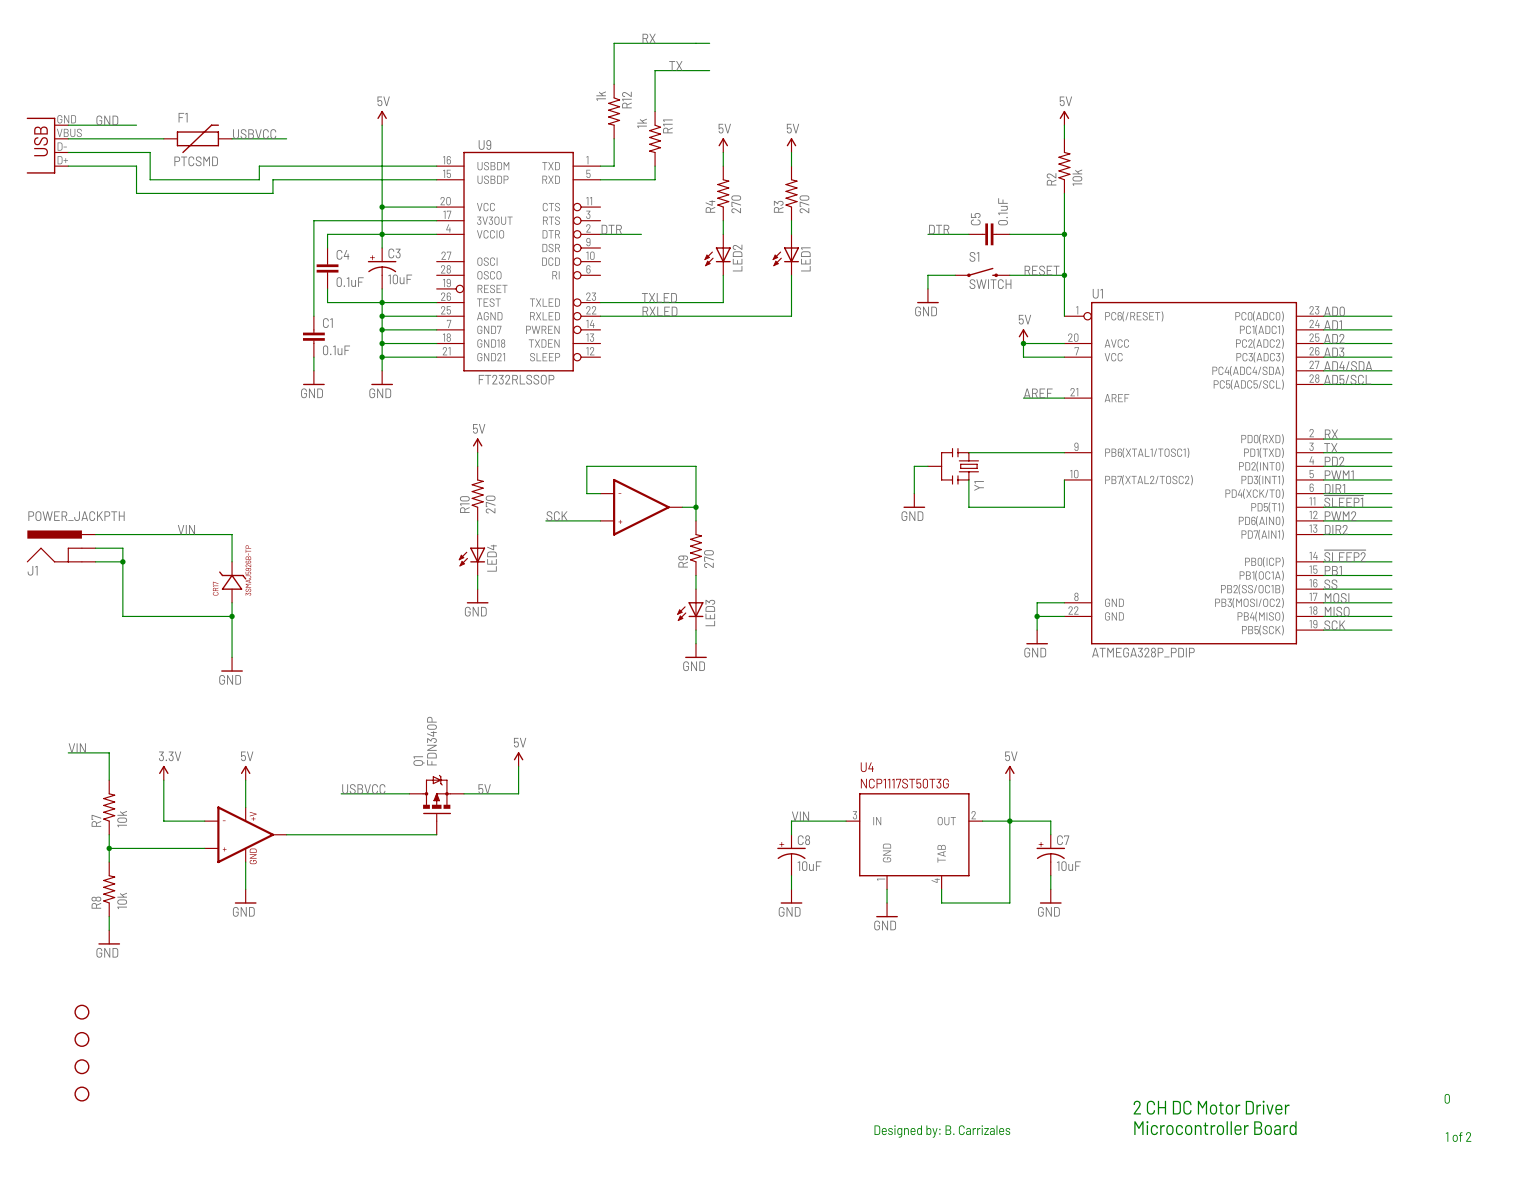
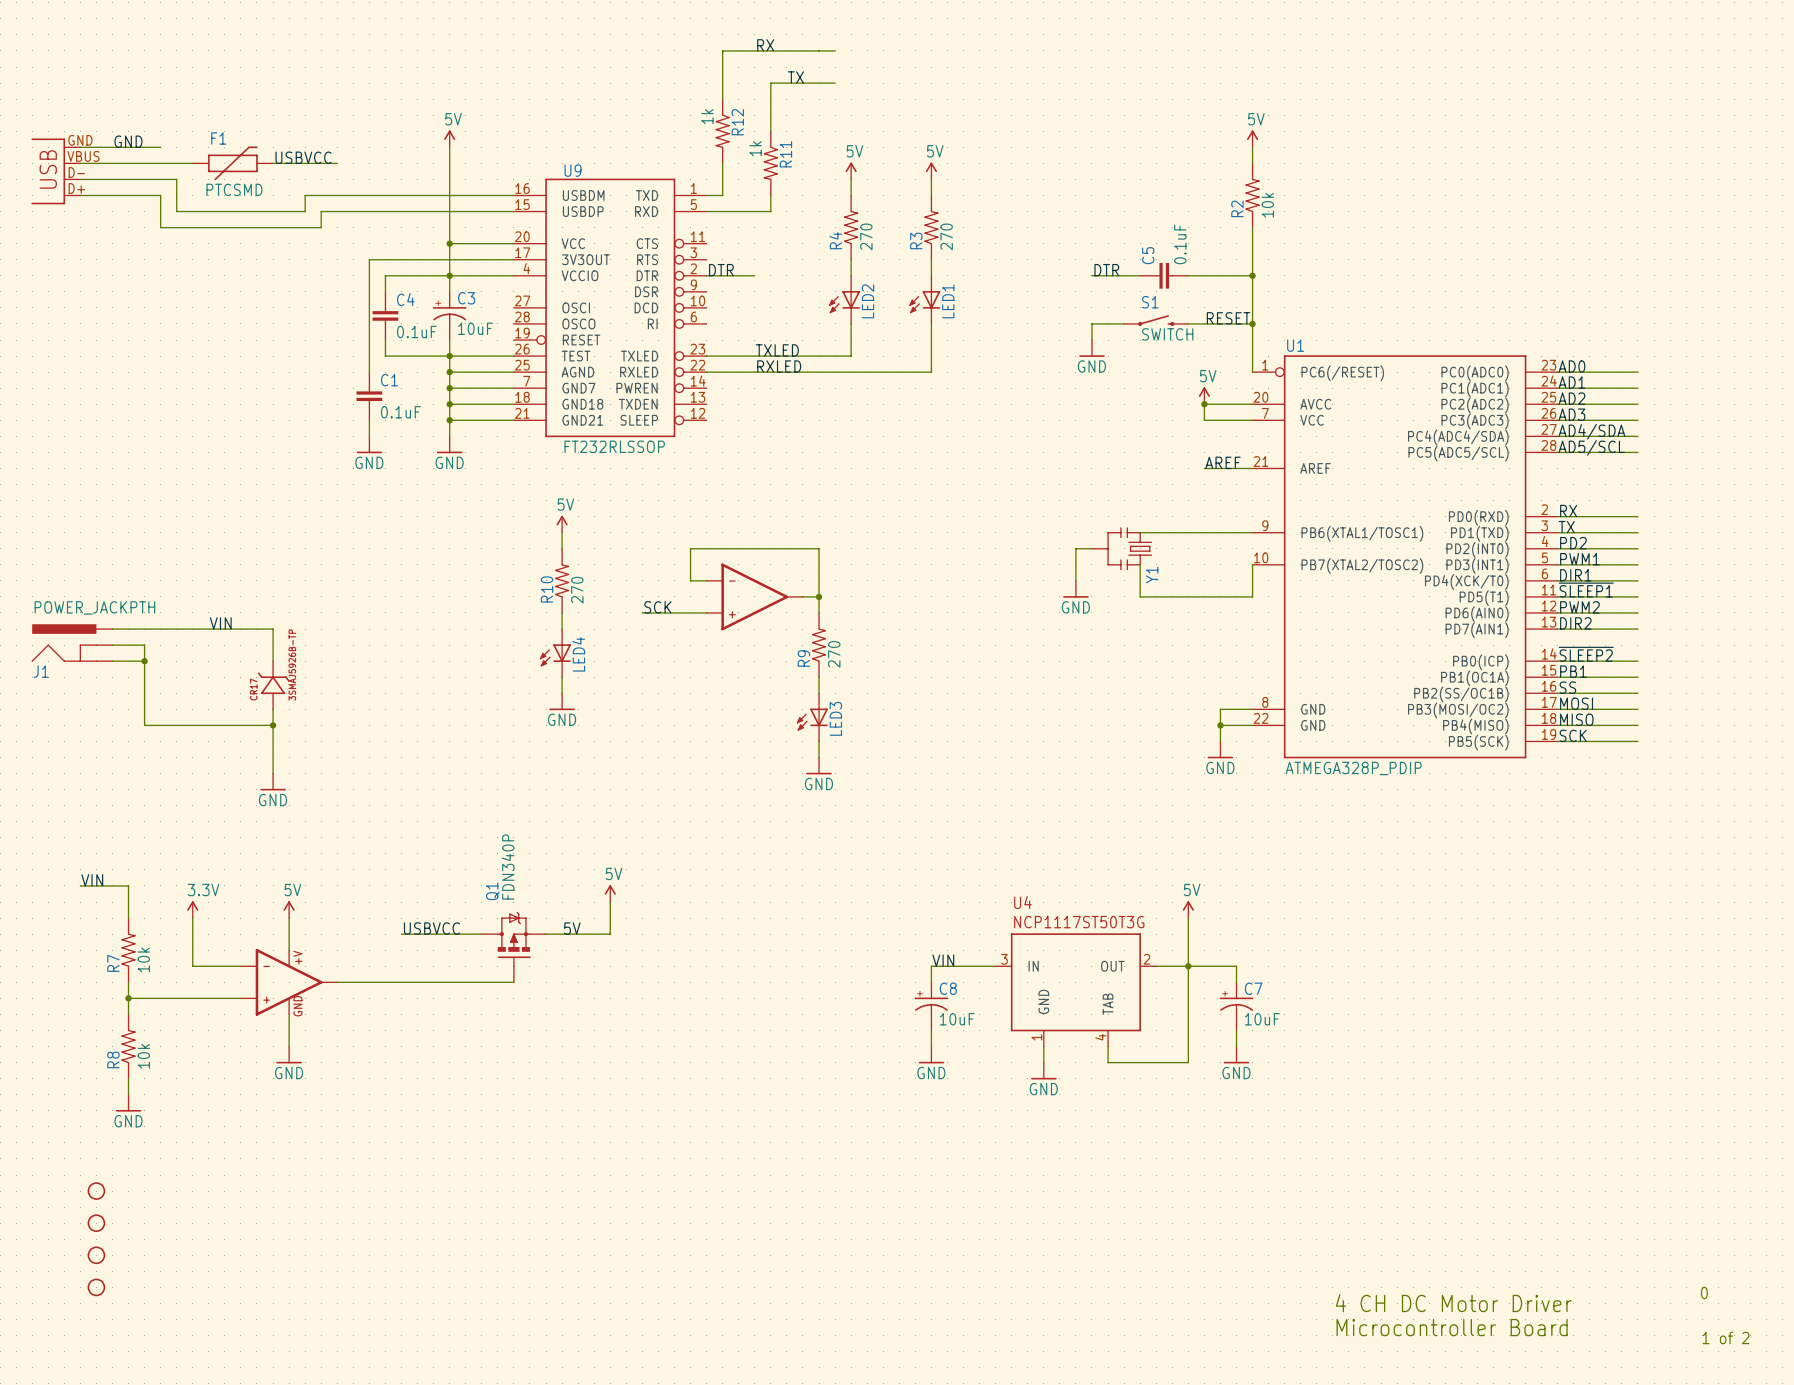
text: 2 CH DC Motor Driver (1211, 1107) -> 4 CH DC Motor Driver (1453, 1303)
text: Designed by: B. Carrizales (942, 1131) -> none

